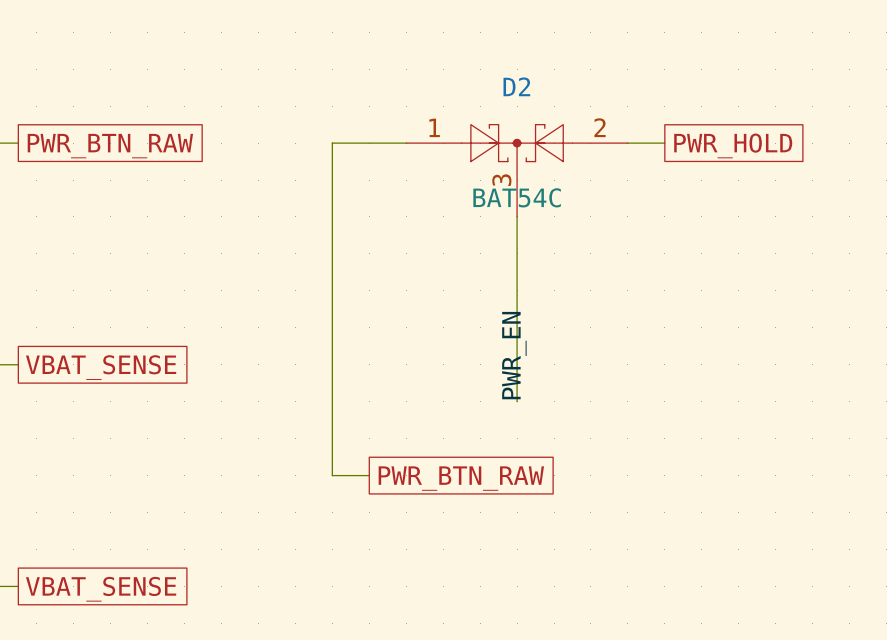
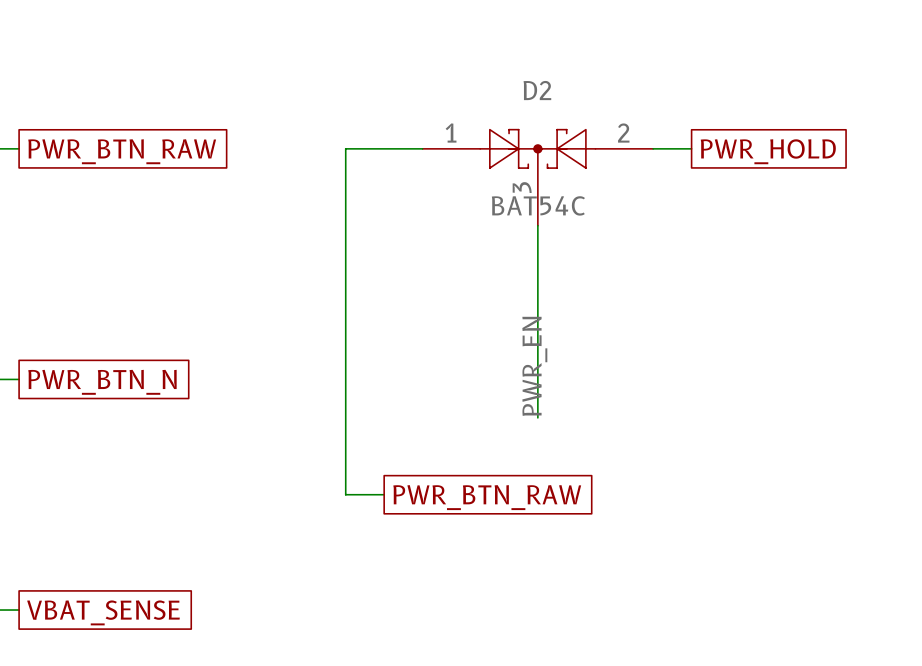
global label: VBAT_SENSE (101, 367) -> PWR_BTN_N (102, 382)

